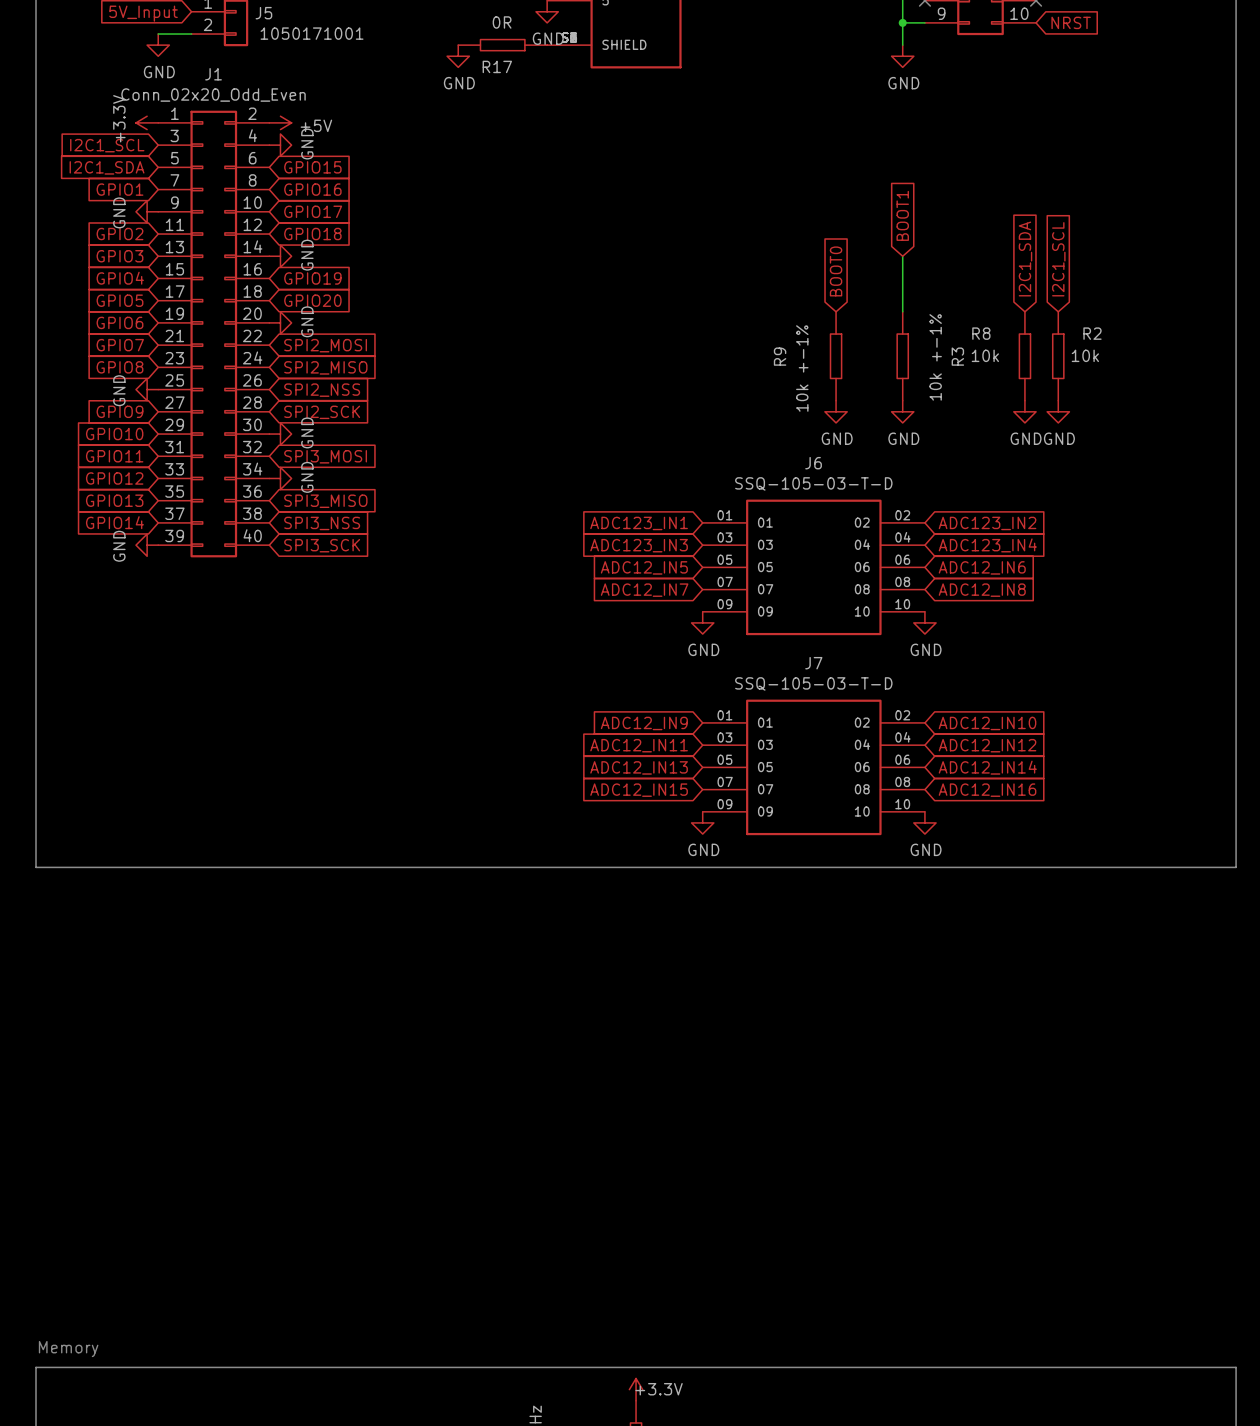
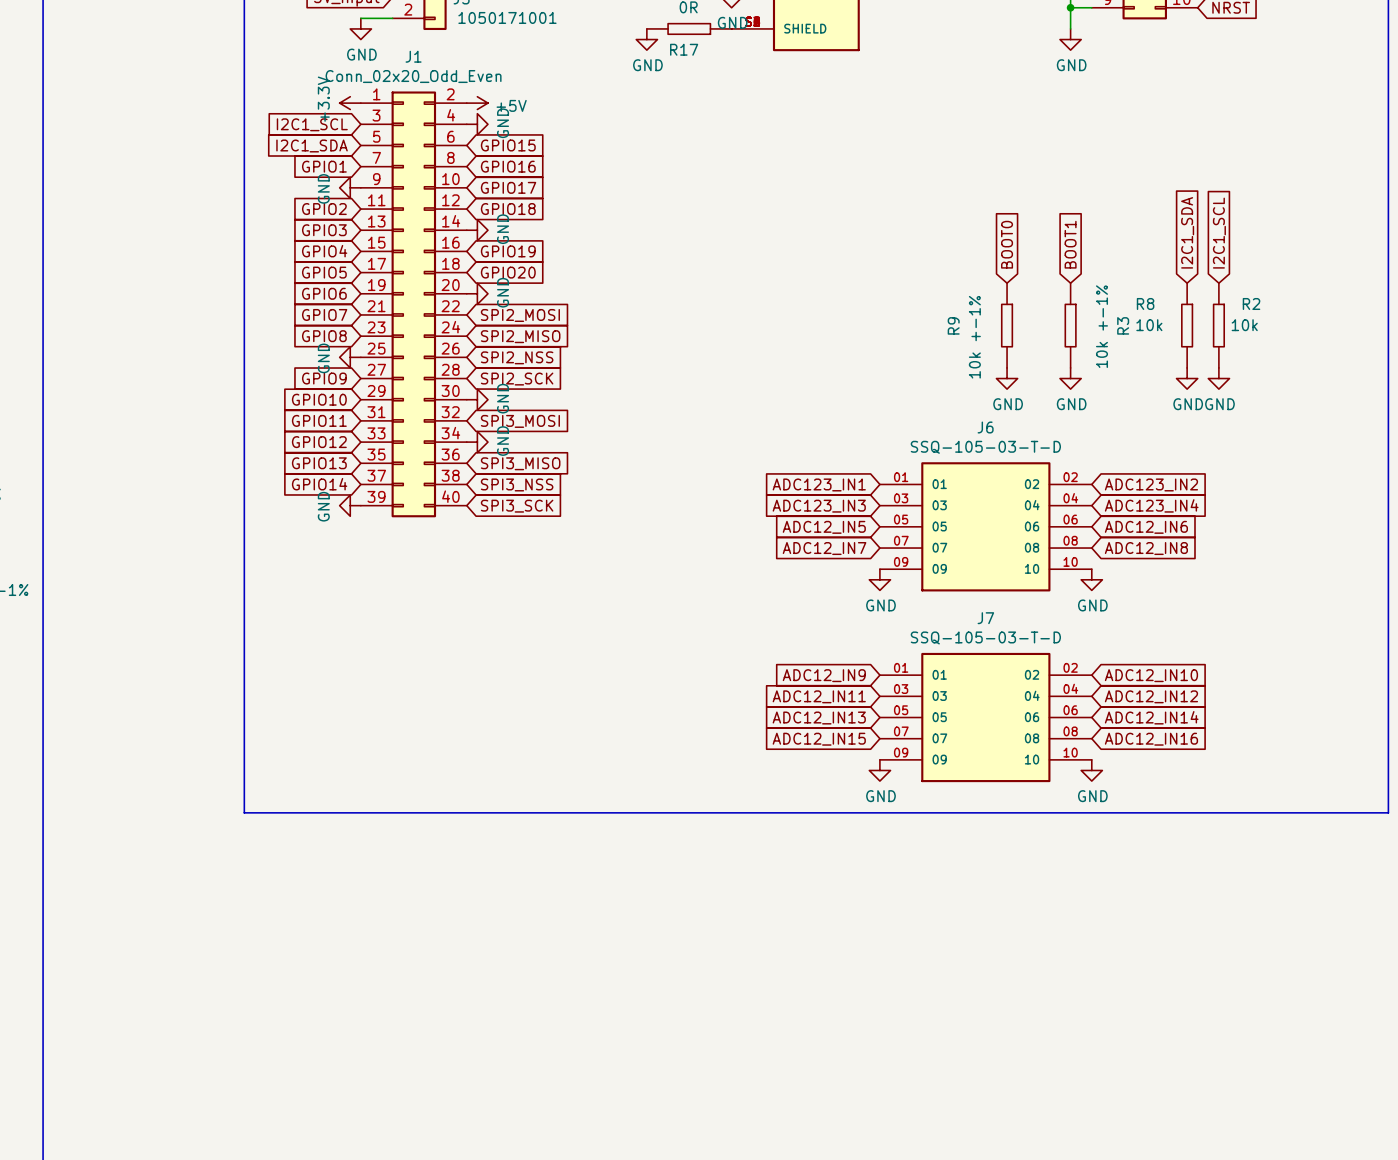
global label position: BOOT1 (902, 215) -> BOOT1 (1070, 244)
wire: (902, 256) (902, 311) -> none

